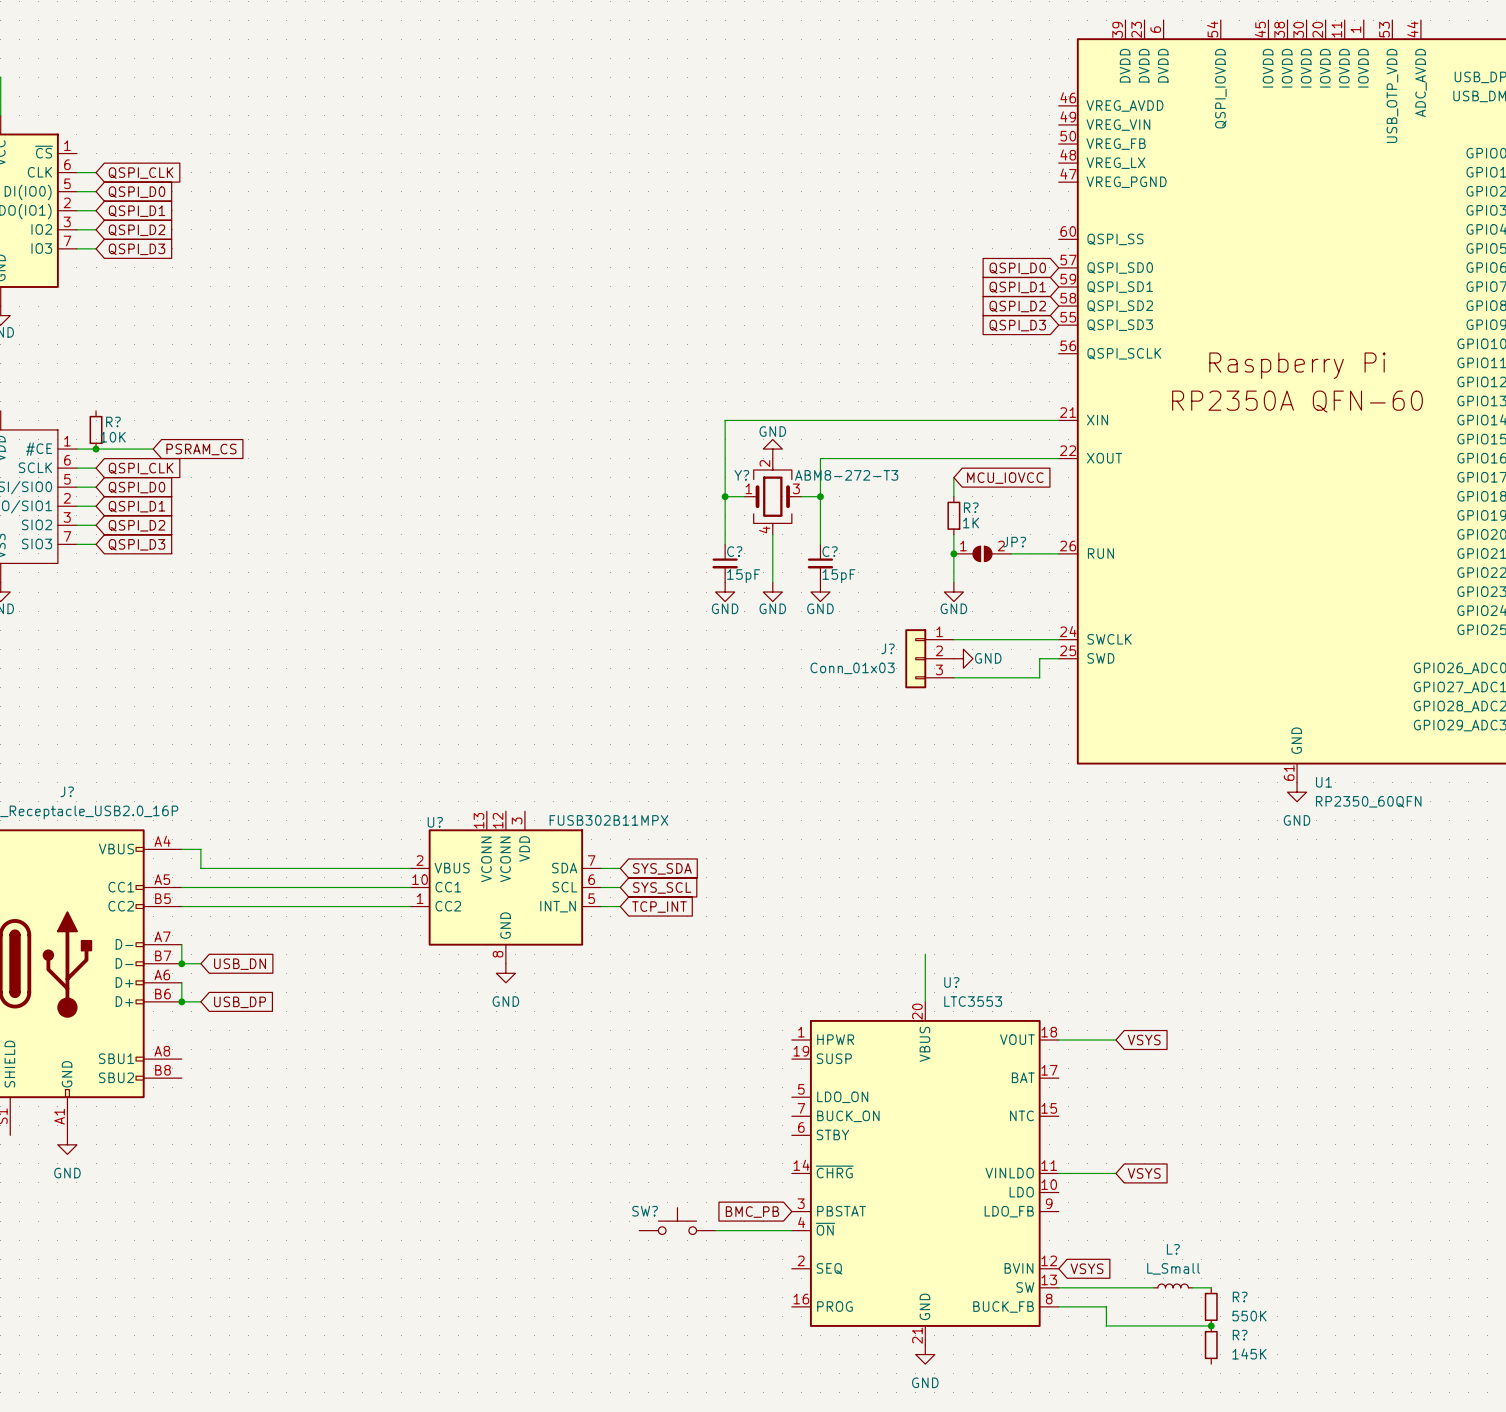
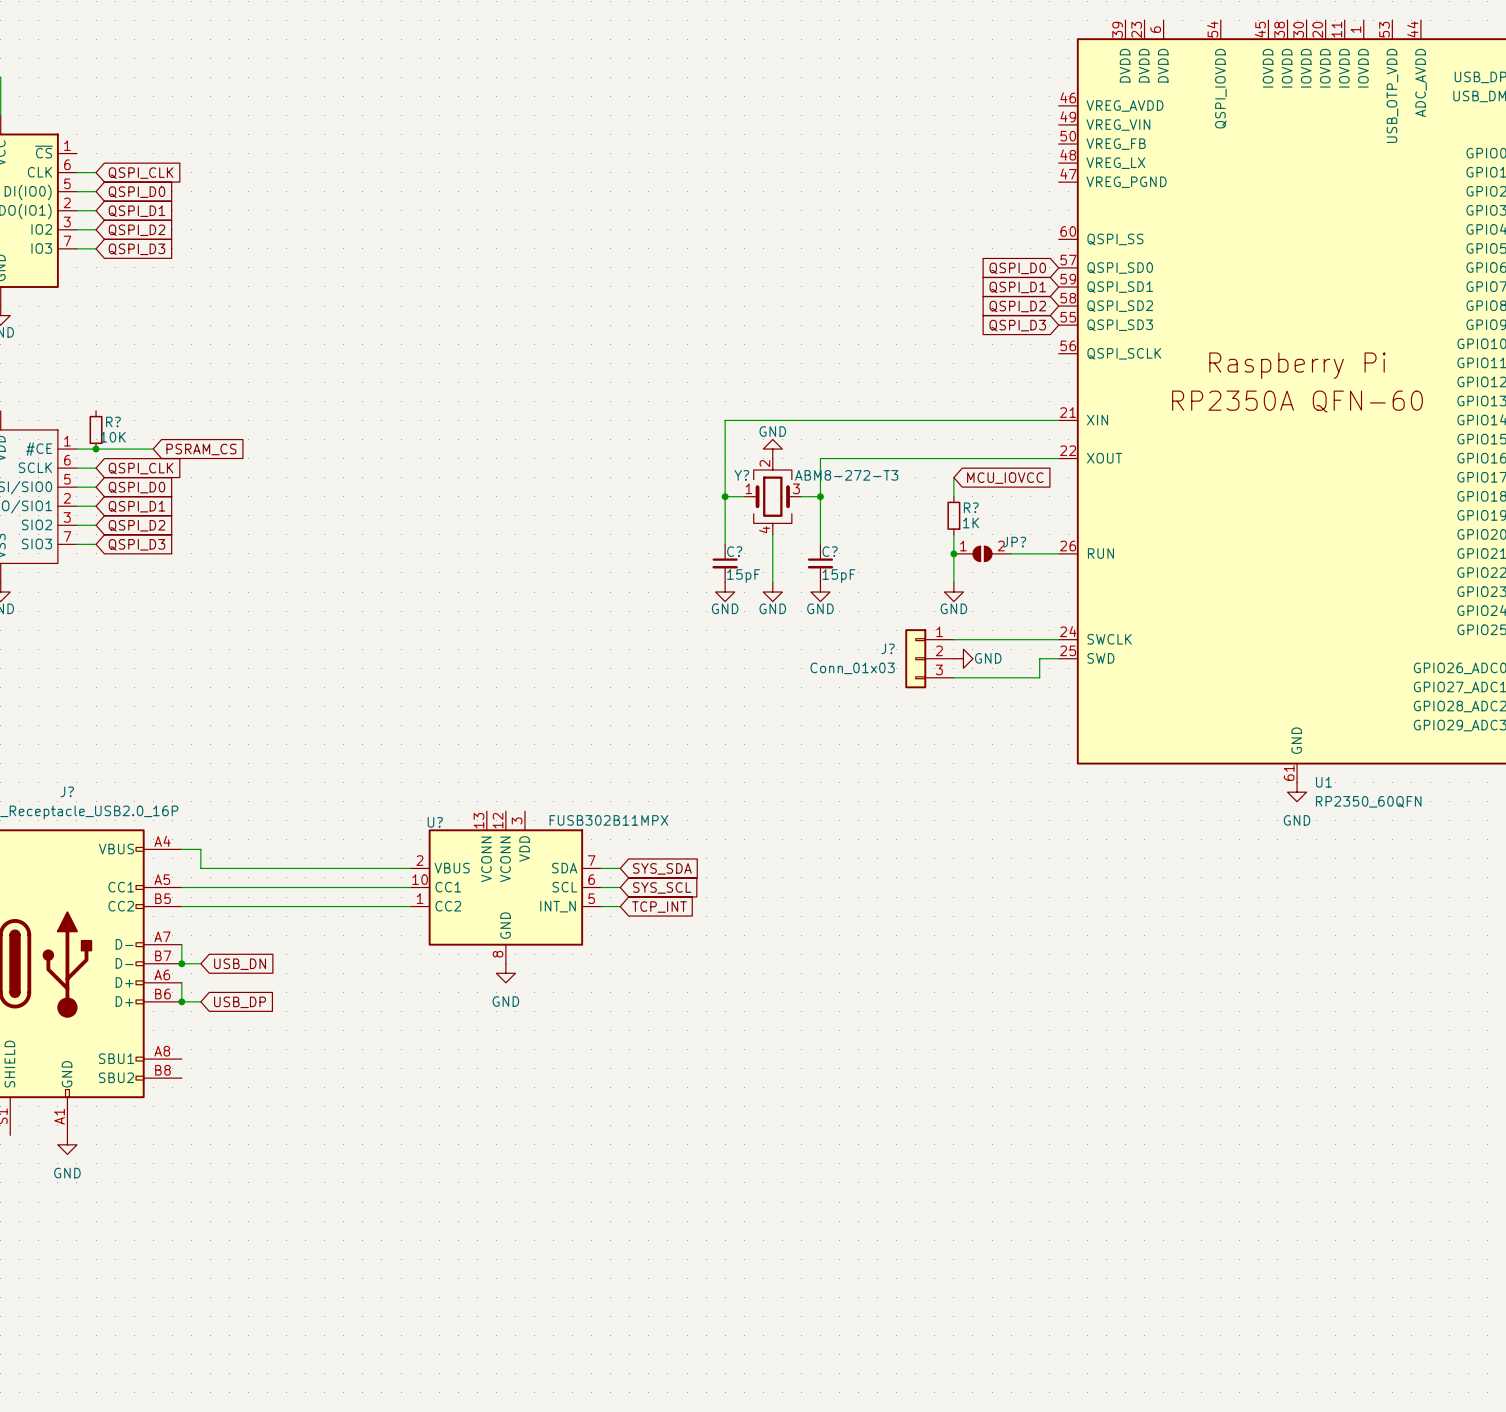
wire: (925, 954) (925, 1001) -> none
wire: (1058, 1040) (1115, 1040) -> none
global label: VSYS (1144, 1040) -> none
U?: LTC3553 (925, 1173) -> none
wire: (1058, 1173) (1115, 1173) -> none
global label: VSYS (1144, 1173) -> none
global label: BMC_PB (752, 1212) -> none
SW?: (677, 1221) -> none
wire: (715, 1230) (791, 1230) -> none
global label: VSYS (1087, 1268) -> none
L?: L_Small (1173, 1285) -> none
wire: (1058, 1287) (1154, 1287) -> none
wire: (1192, 1287) (1211, 1287) -> none
wire: (1058, 1306) (1106, 1306) (1106, 1325) (1211, 1325) -> none
R?: 550K (1211, 1306) -> none
junction: (1211, 1325) -> none
R?: 145K (1211, 1345) -> none
power symbol: GND (925, 1354) -> none

